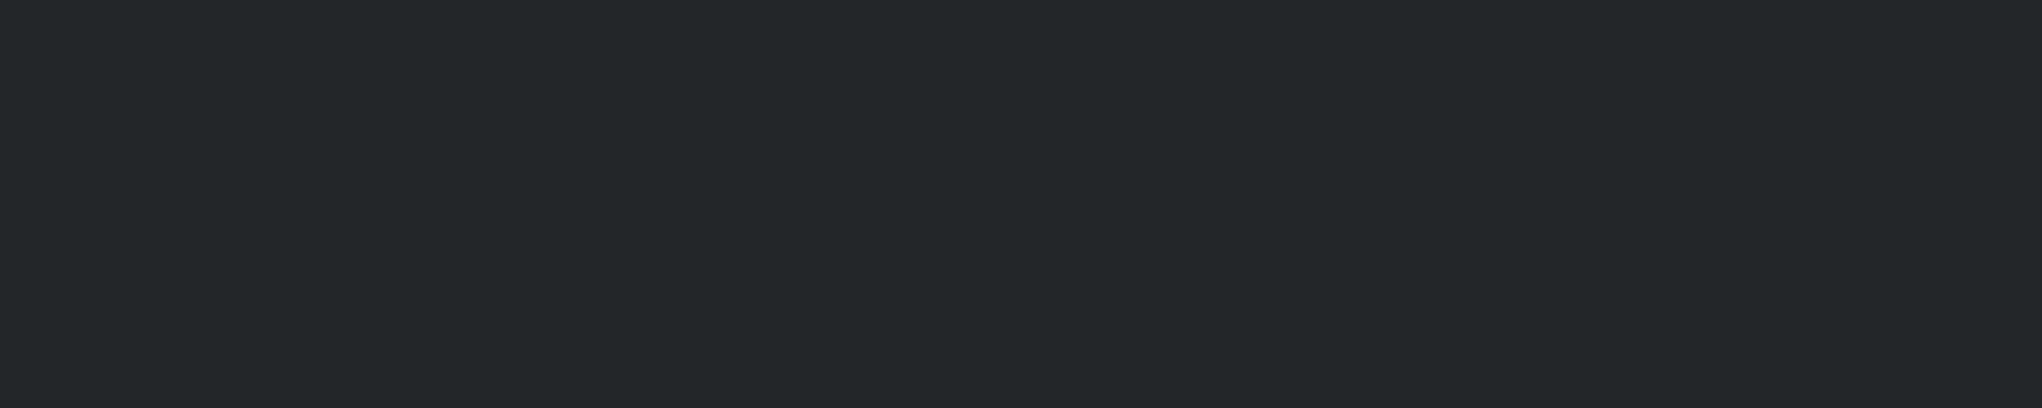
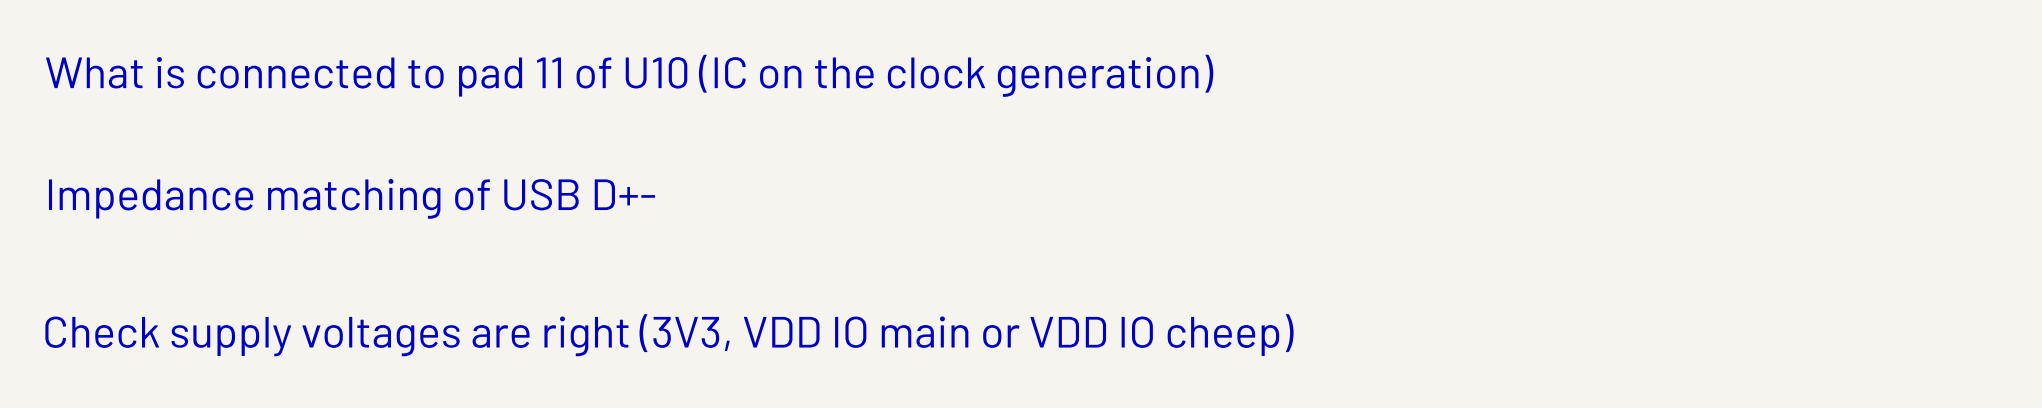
text: none -> What is connected to pad 11 of U10 (IC on the clock generation) (629, 75)
text: none -> Impedance matching of USB D+- (352, 198)
text: none -> Check supply voltages are right (3V3, VDD IO main or VDD IO cheep) (669, 335)

